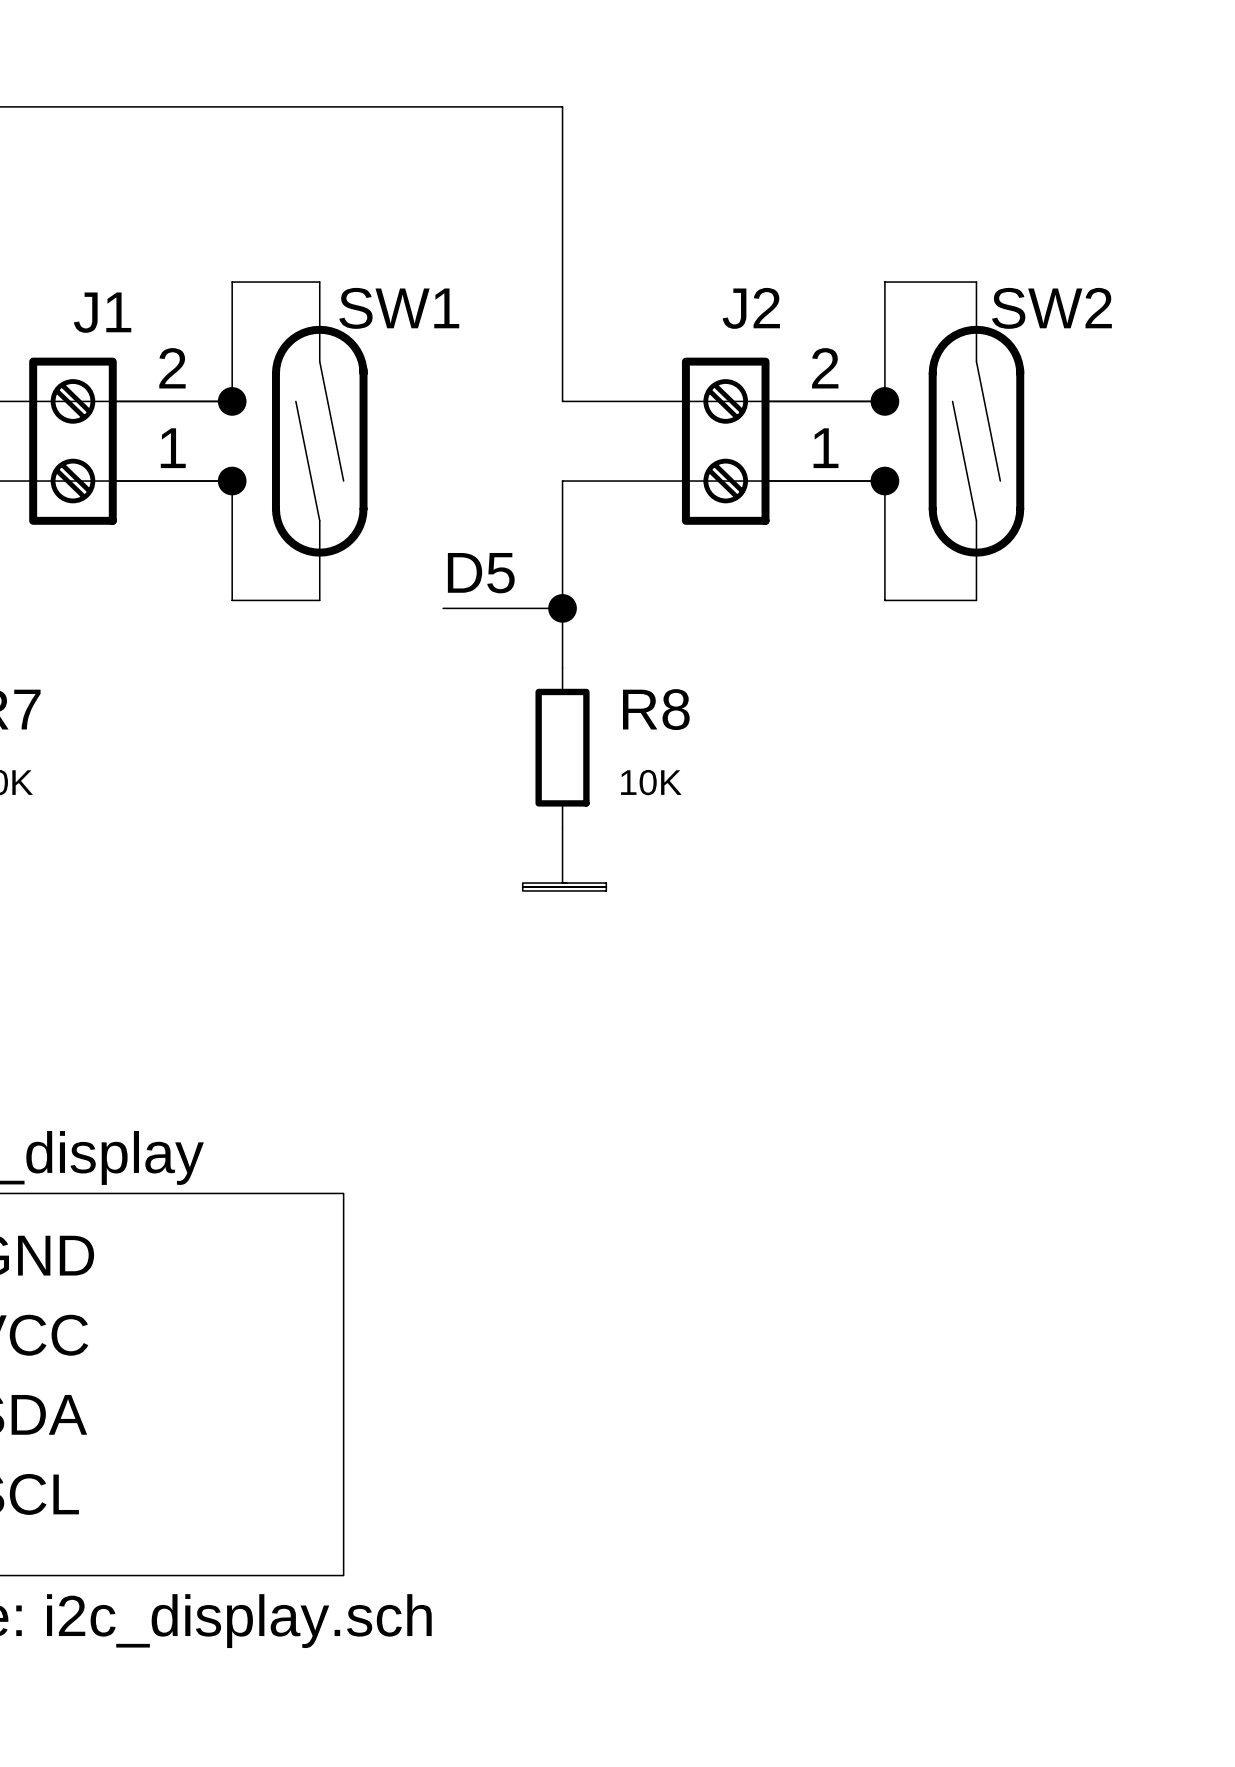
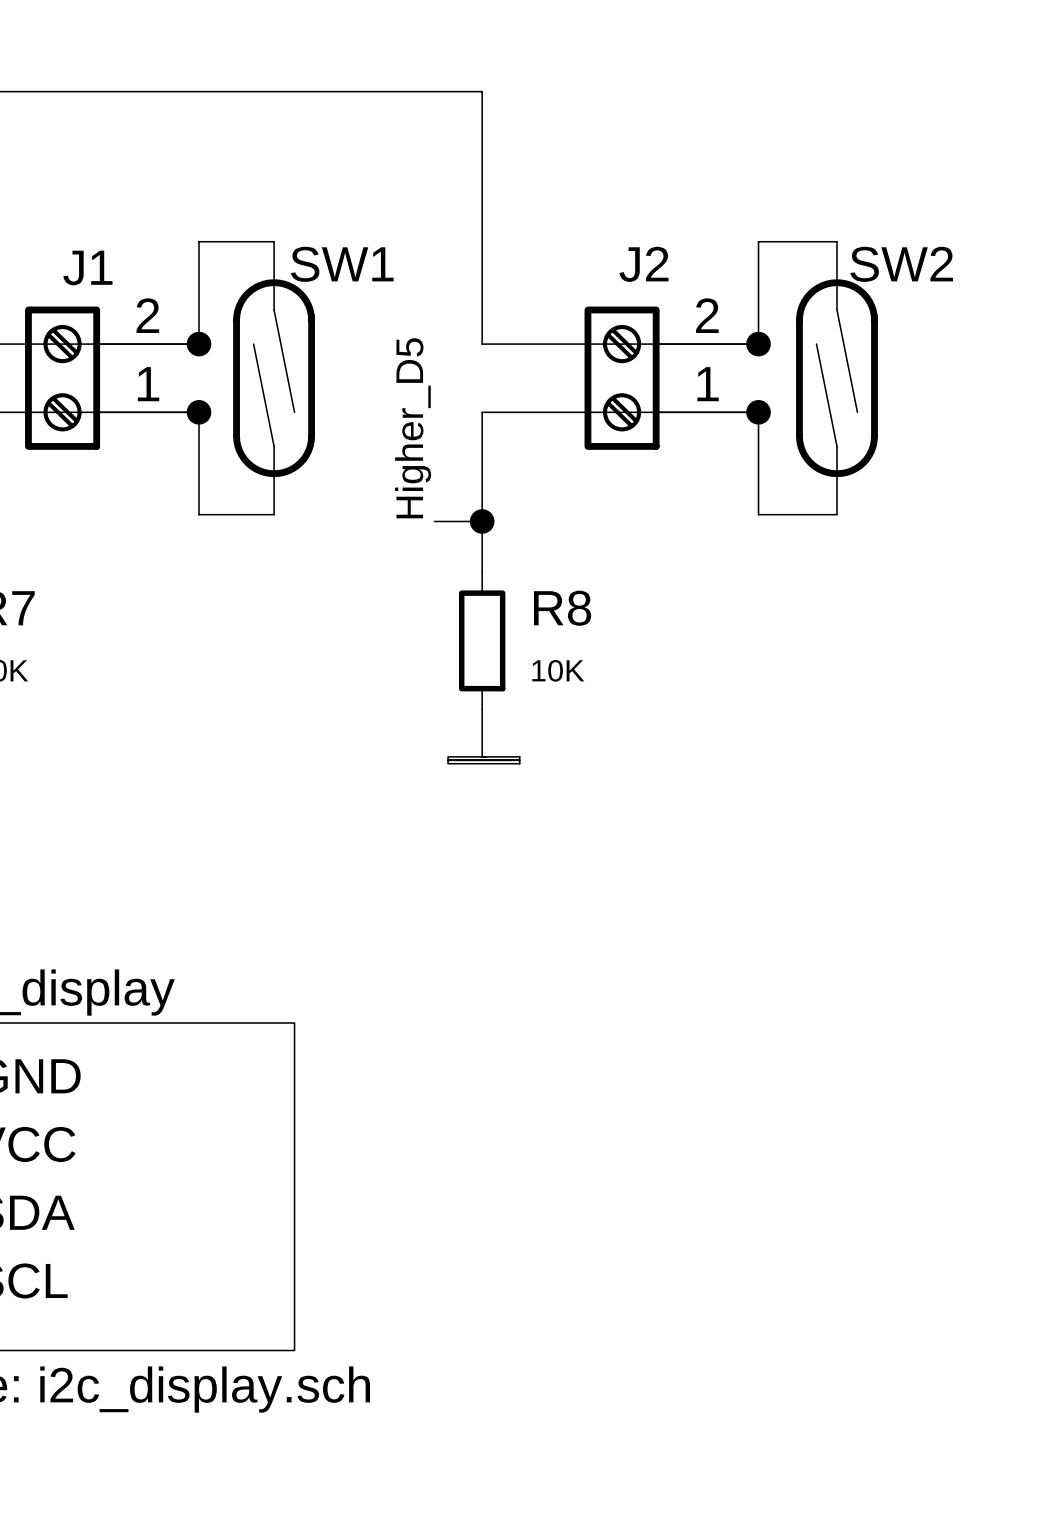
label: none -> Higher_D5 (413, 428)
label: D5 (481, 573) -> none
wire: (443, 608) (506, 608) -> none

